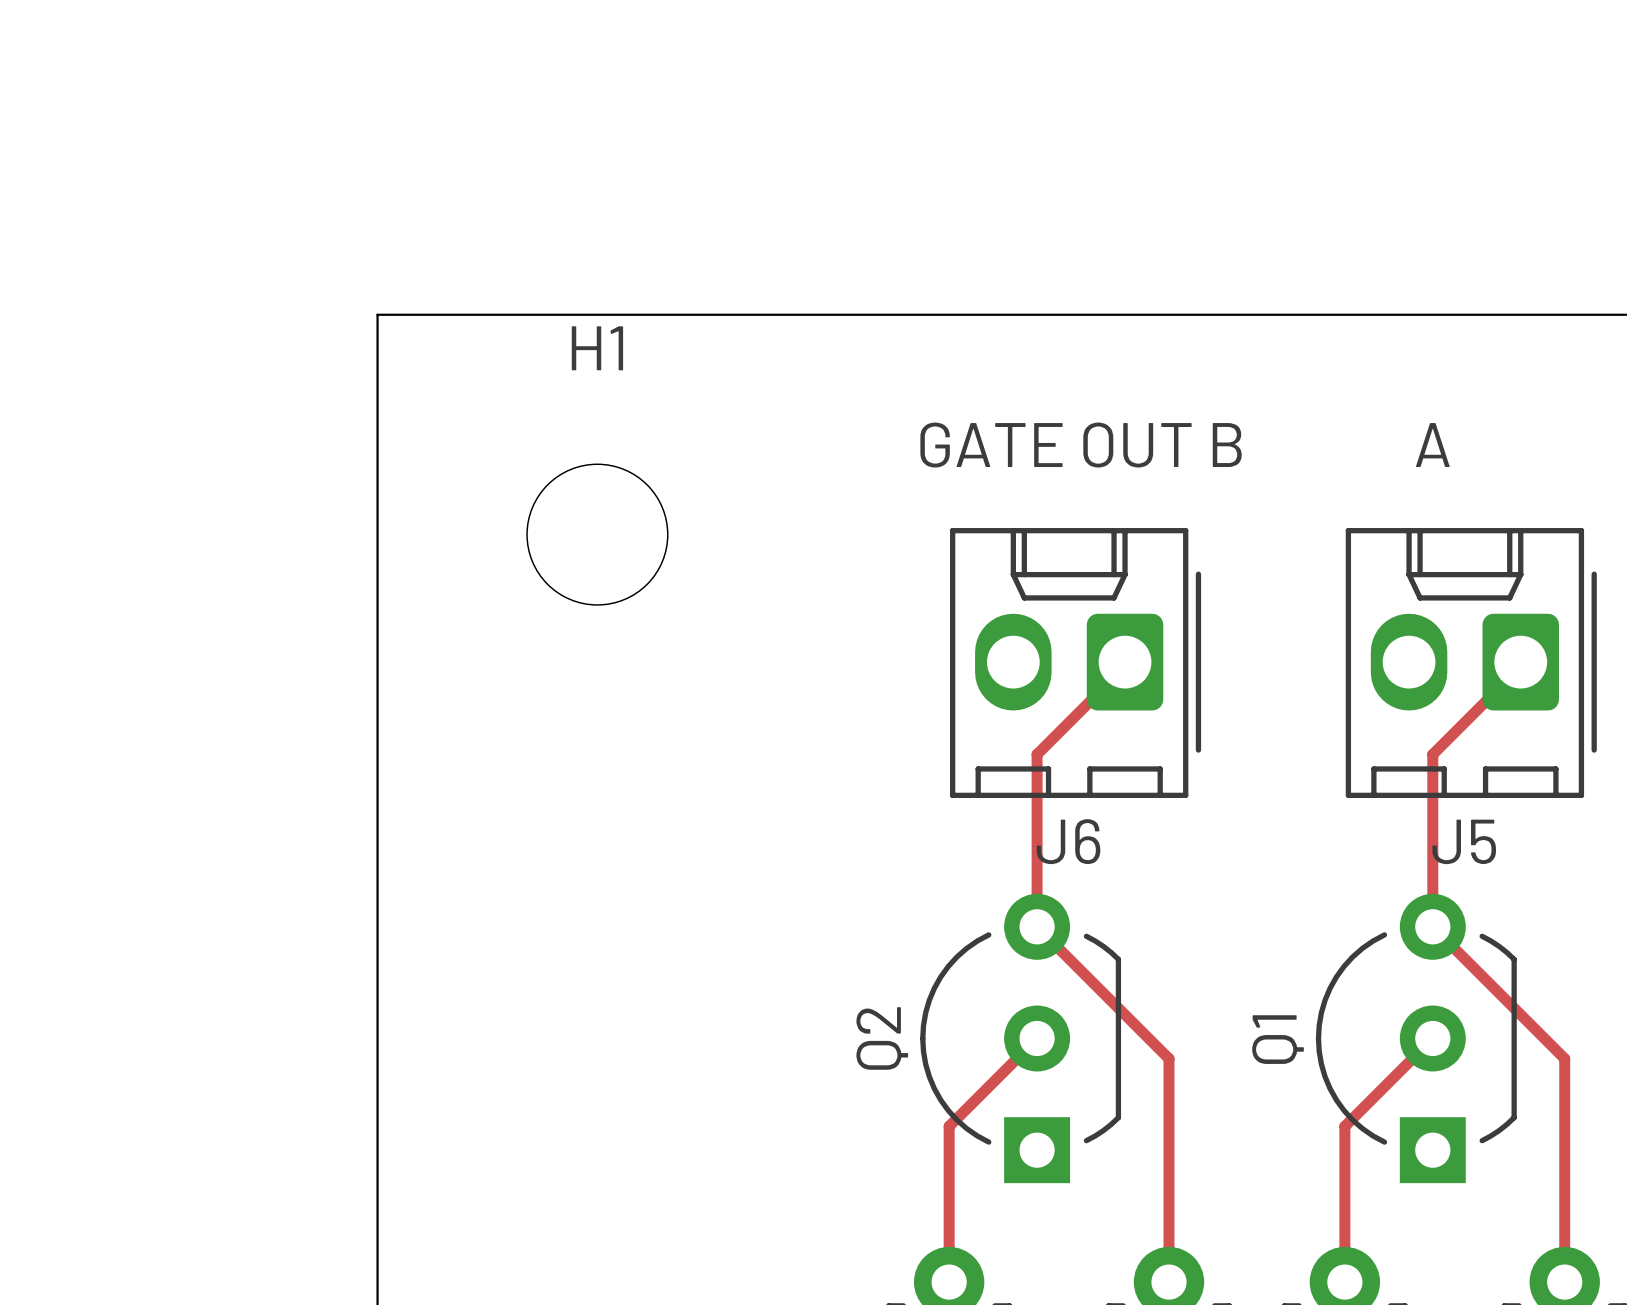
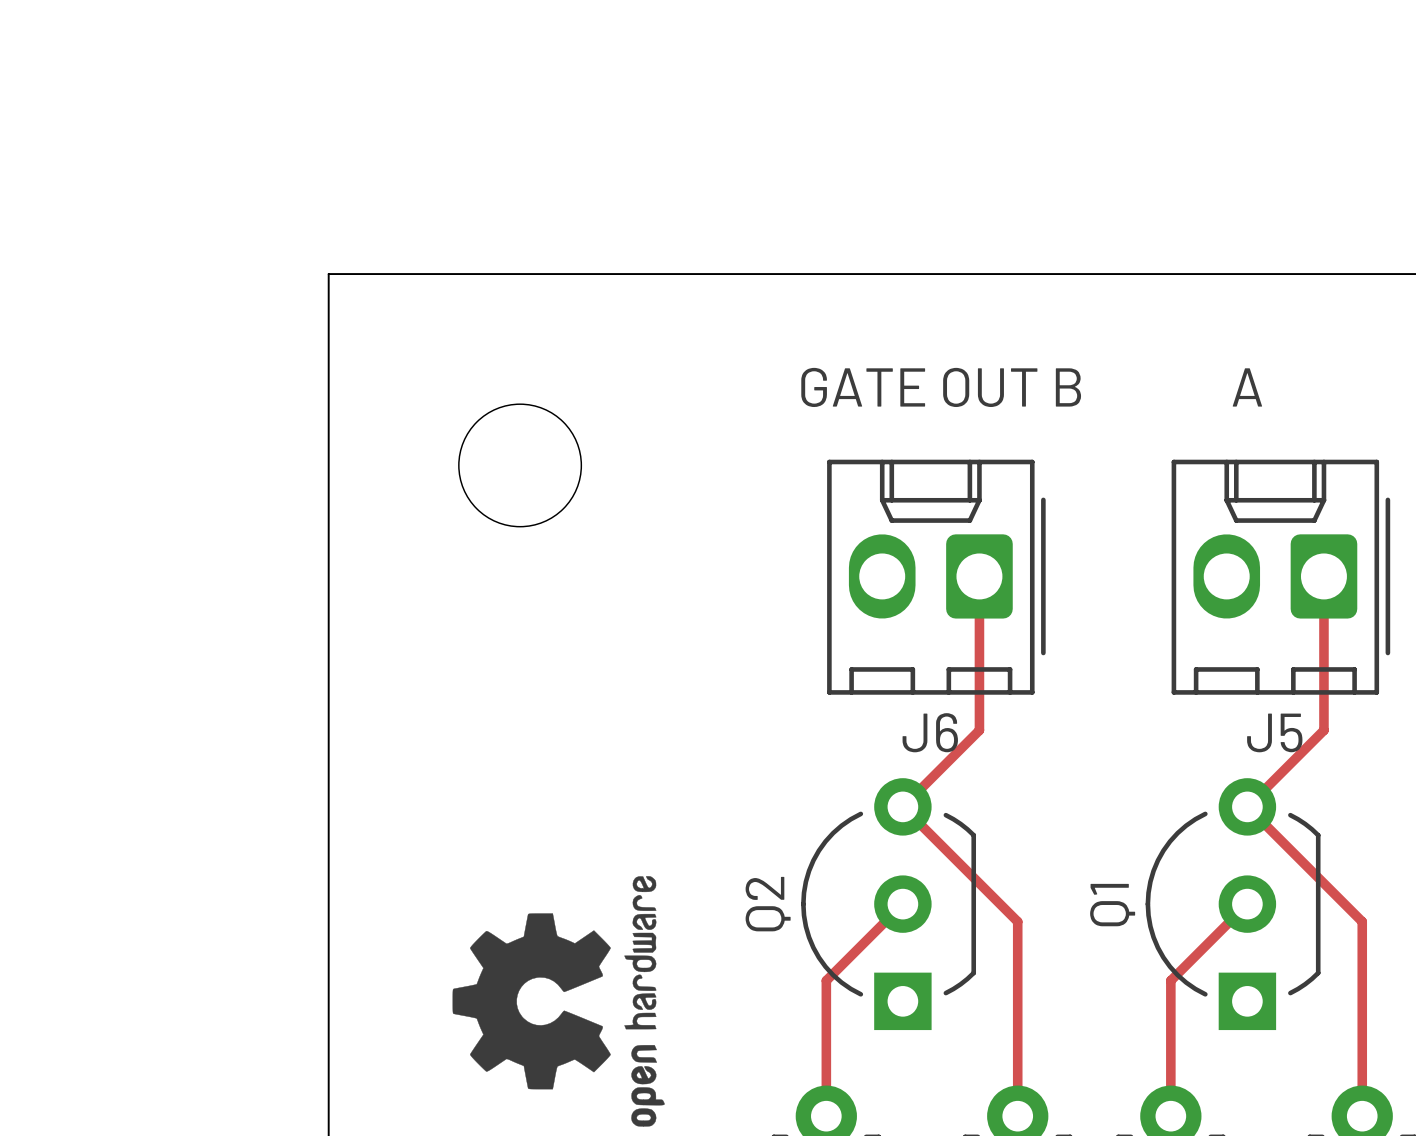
H1 name: H1 (597, 348) -> none
track: (1125, 666) (1037, 754) (1037, 926) -> (979, 576) (979, 730) (902, 806)
track: (1520, 666) (1432, 754) (1432, 926) -> (1323, 576) (1323, 730) (1247, 806)
drawing: none -> [452, 876, 665, 1127]

